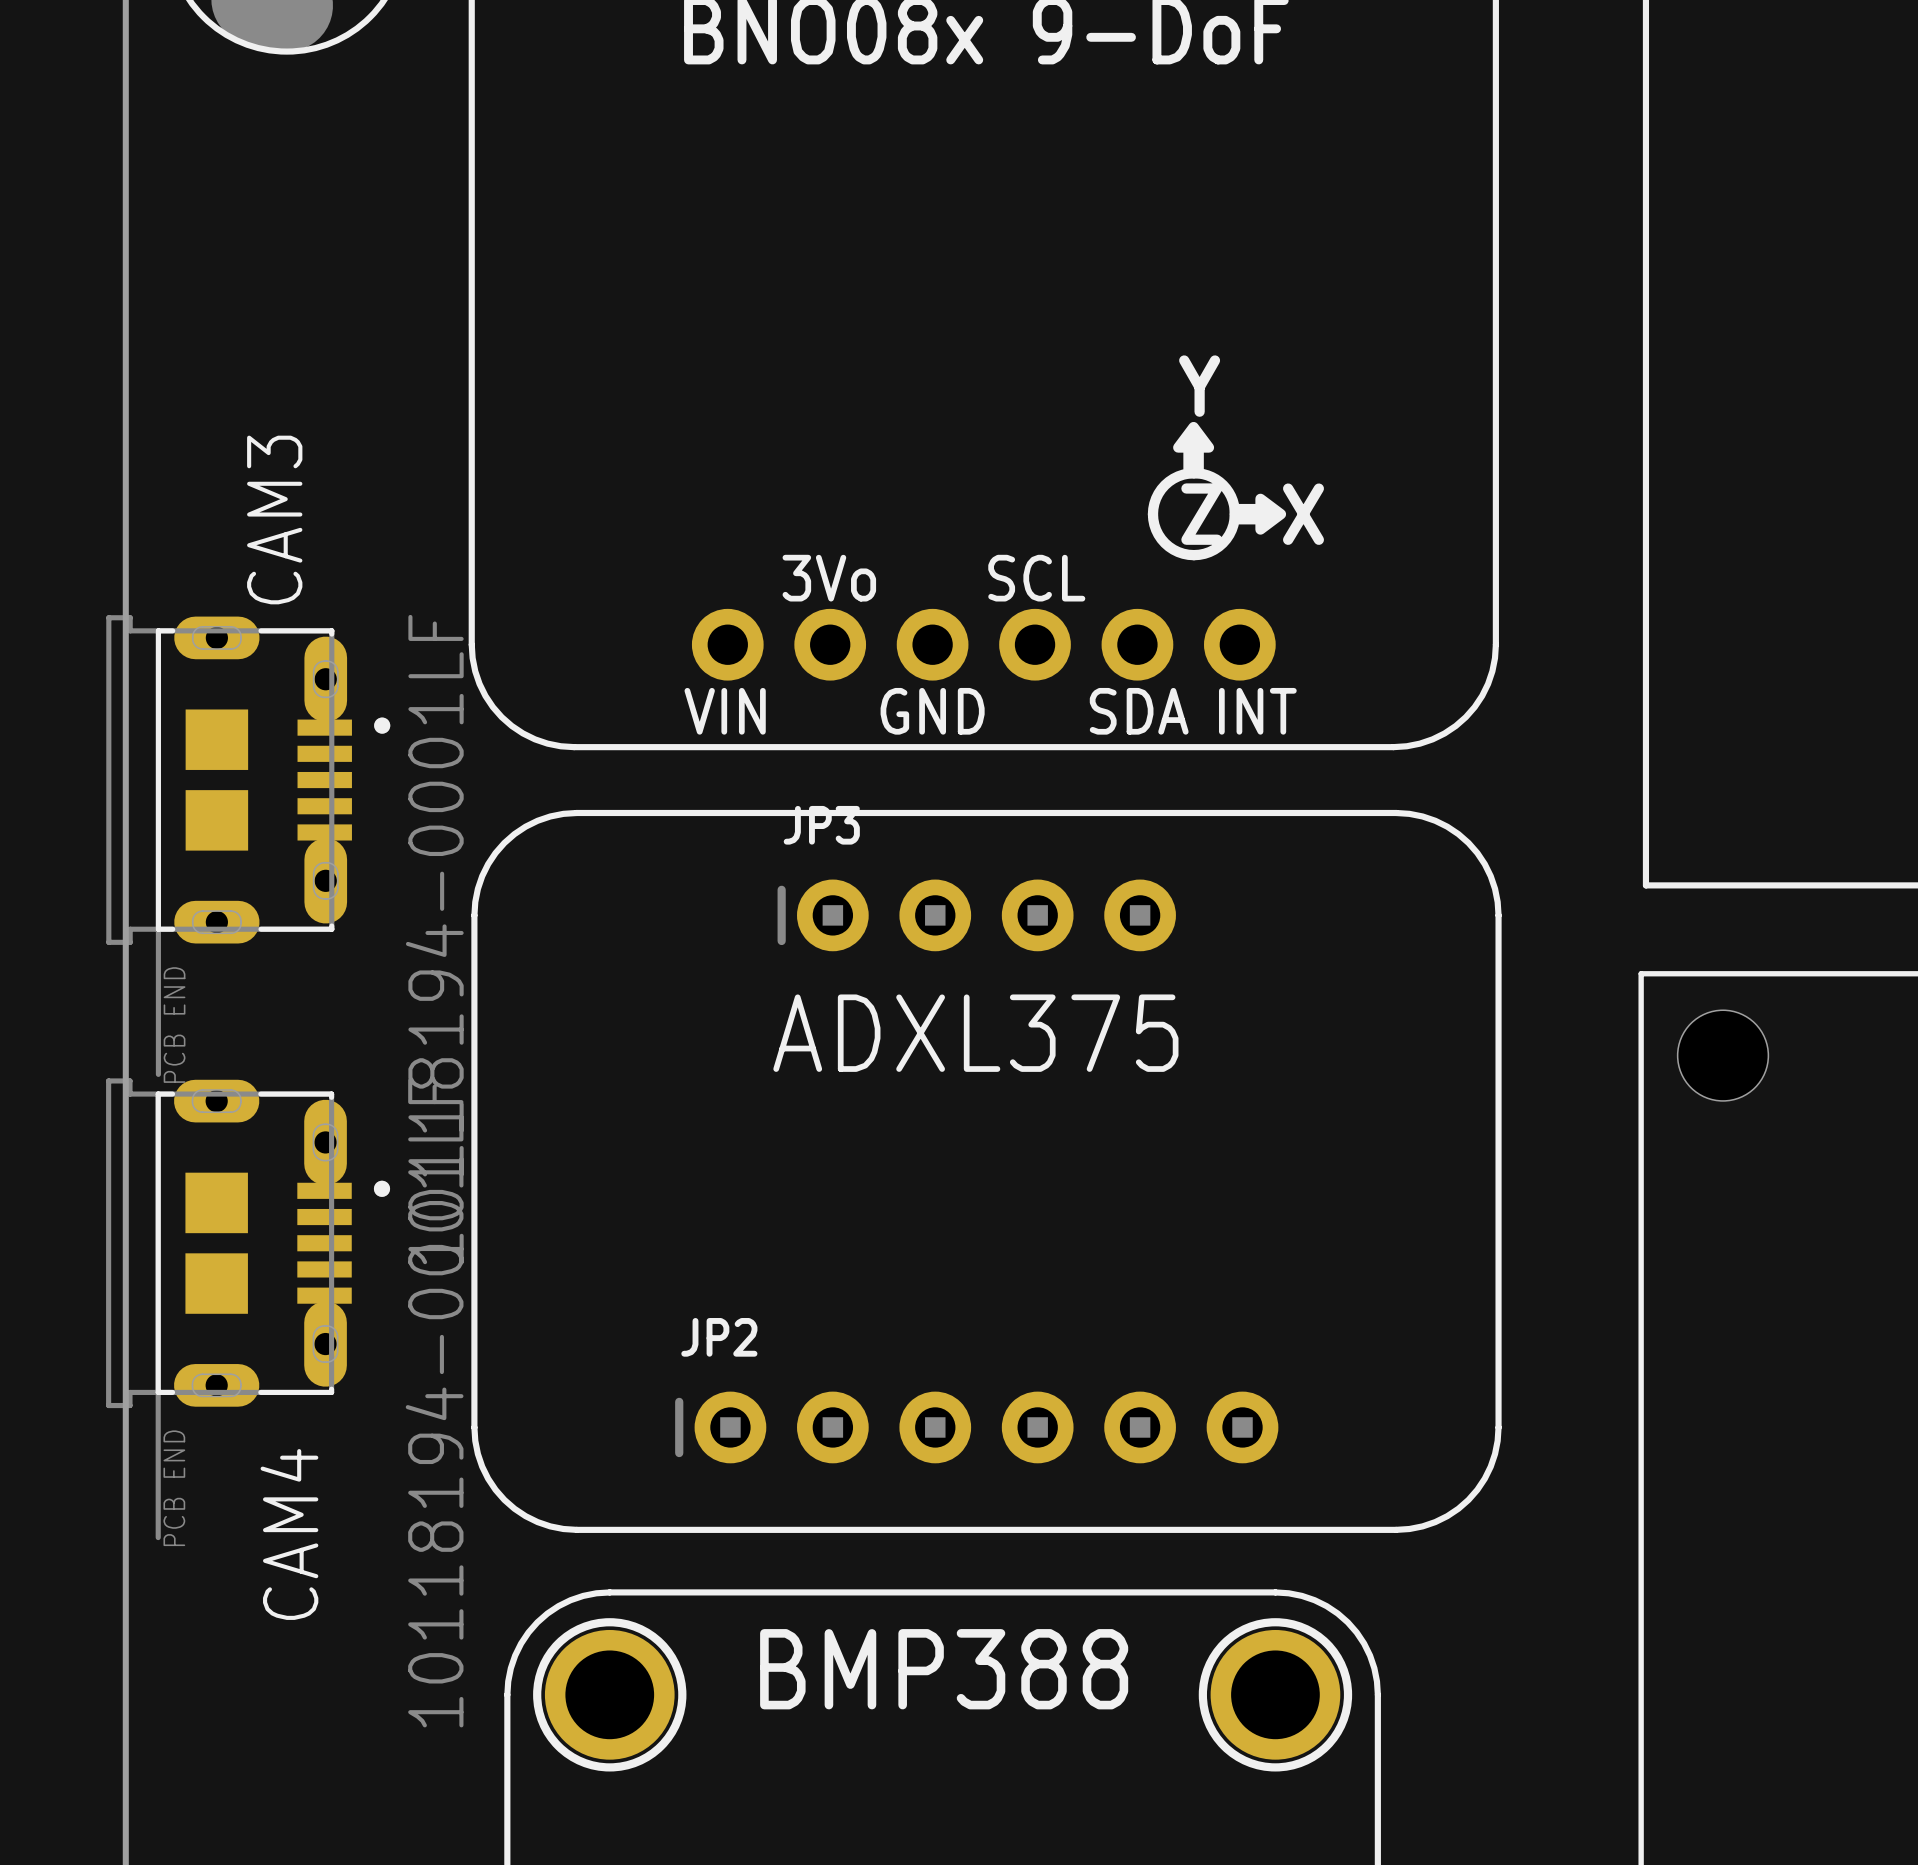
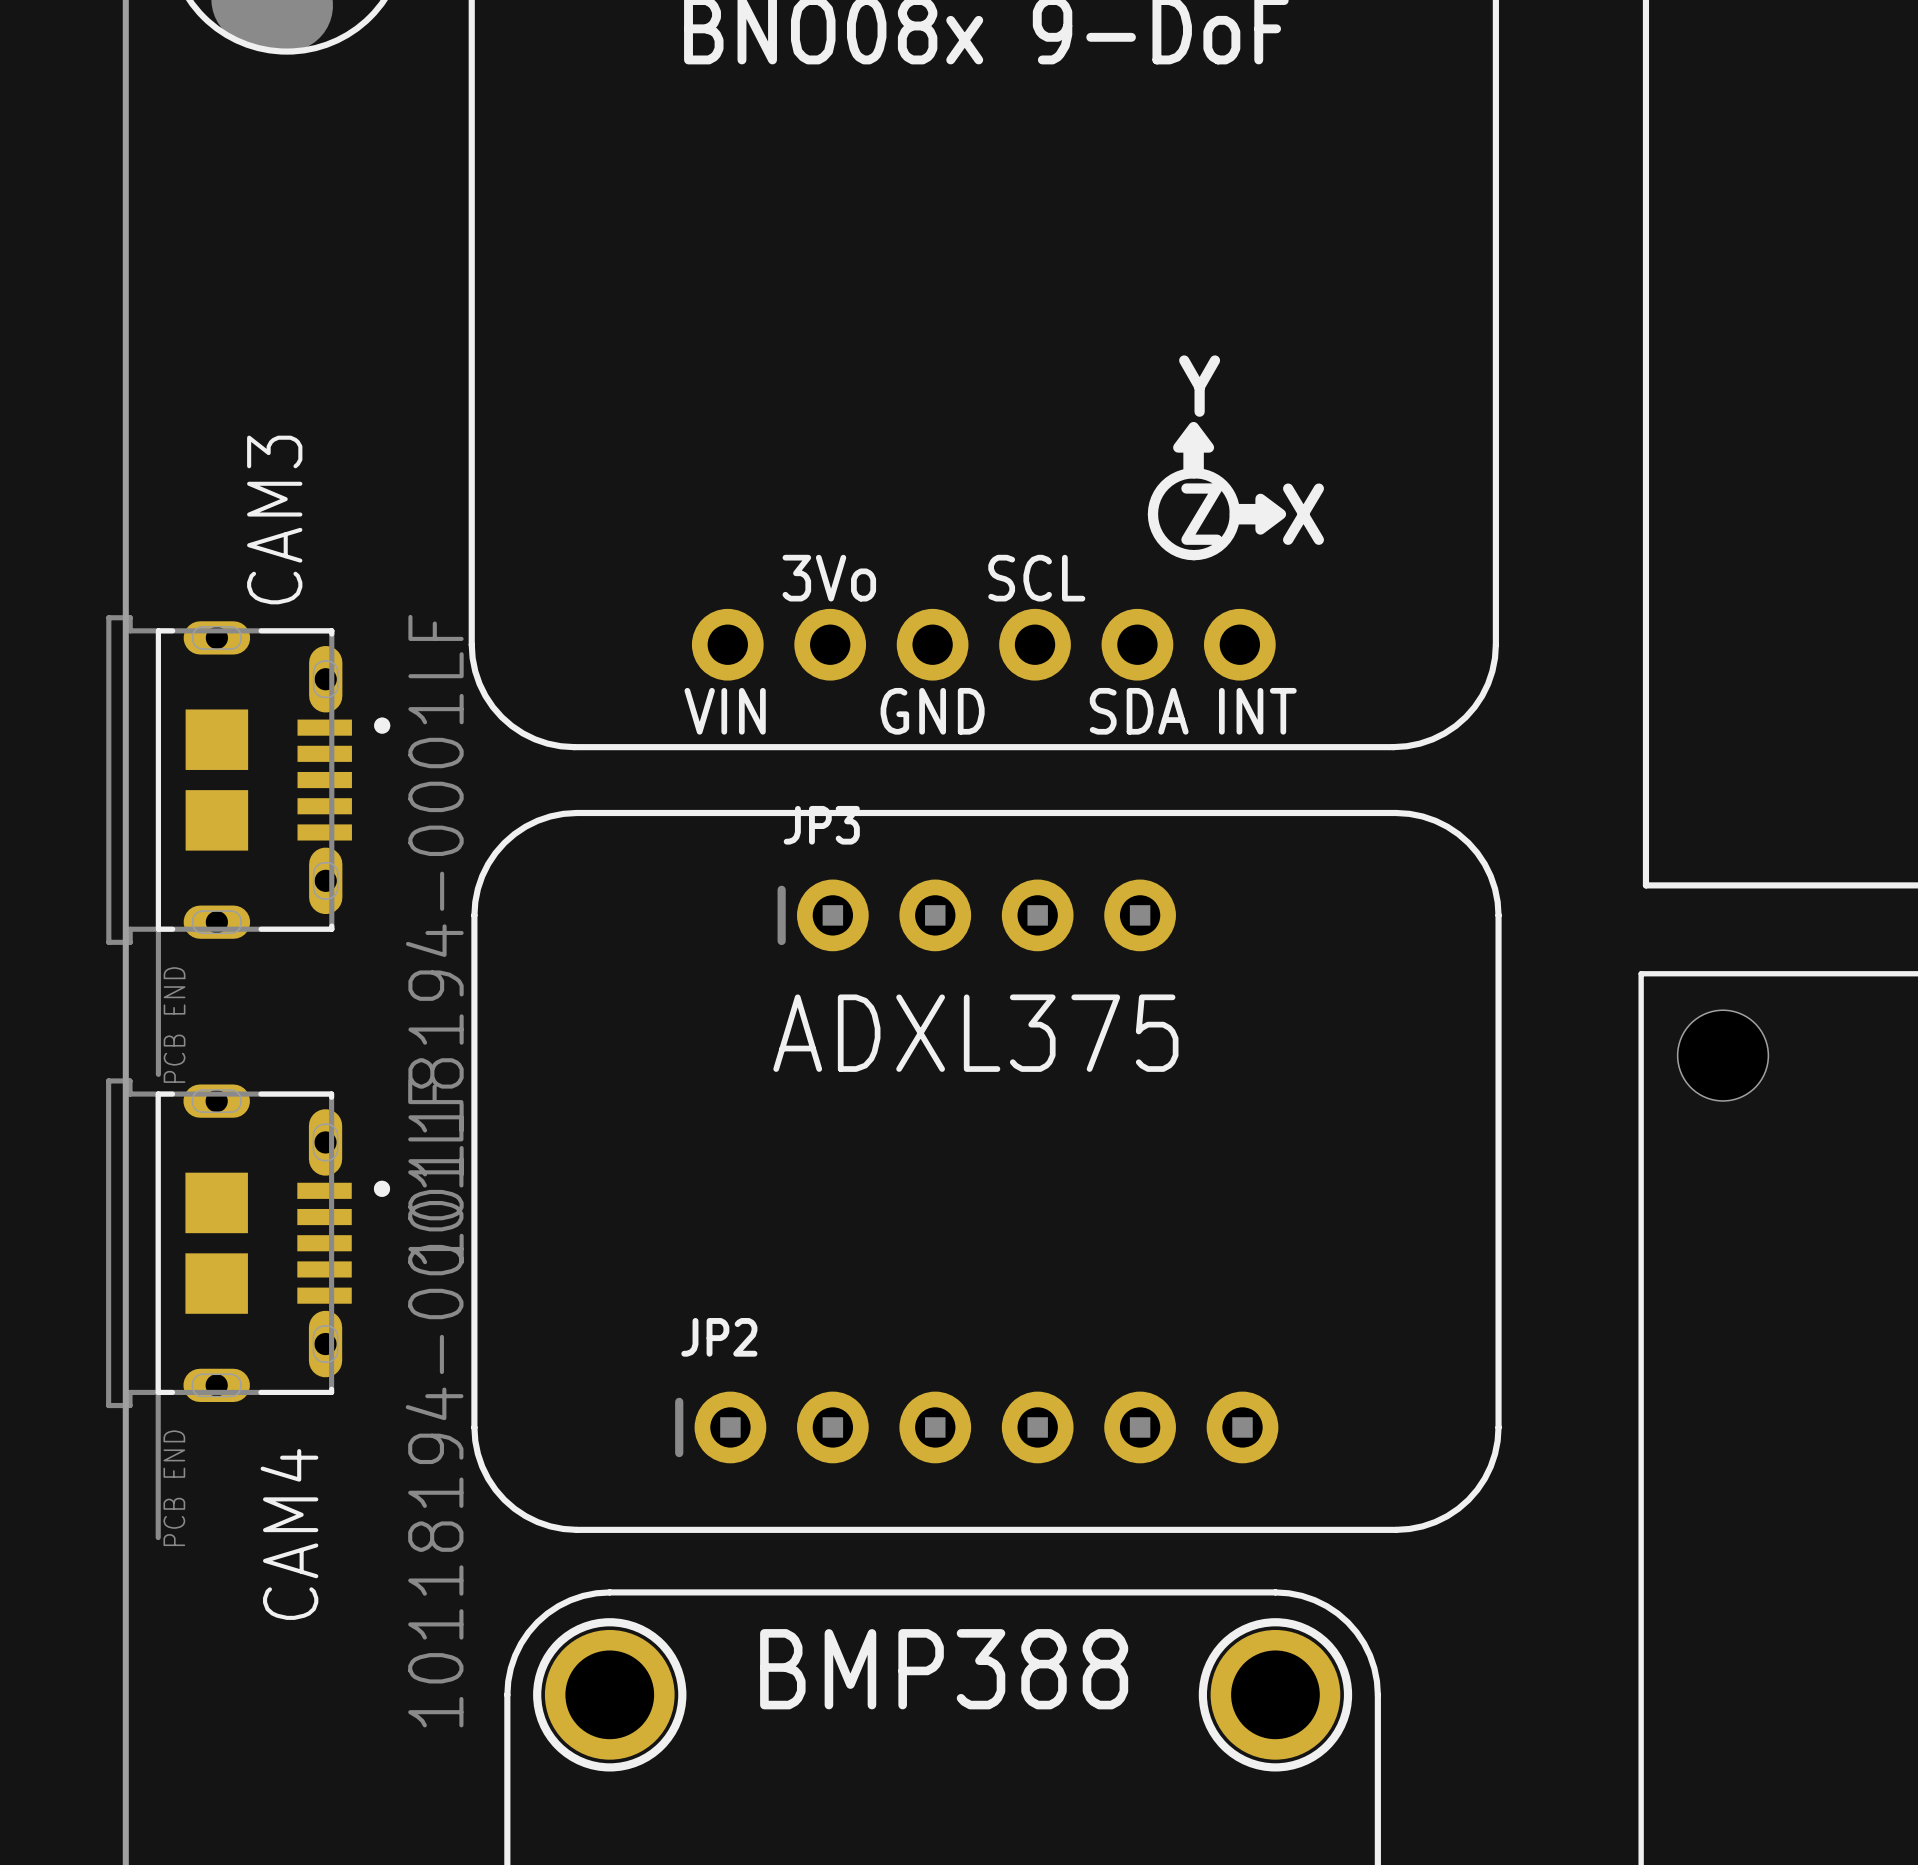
CAM3 footprint: [106, 615, 391, 1077] -> [106, 615, 391, 1077]
CAM4 footprint: [106, 1078, 391, 1541] -> [106, 1078, 391, 1541]

